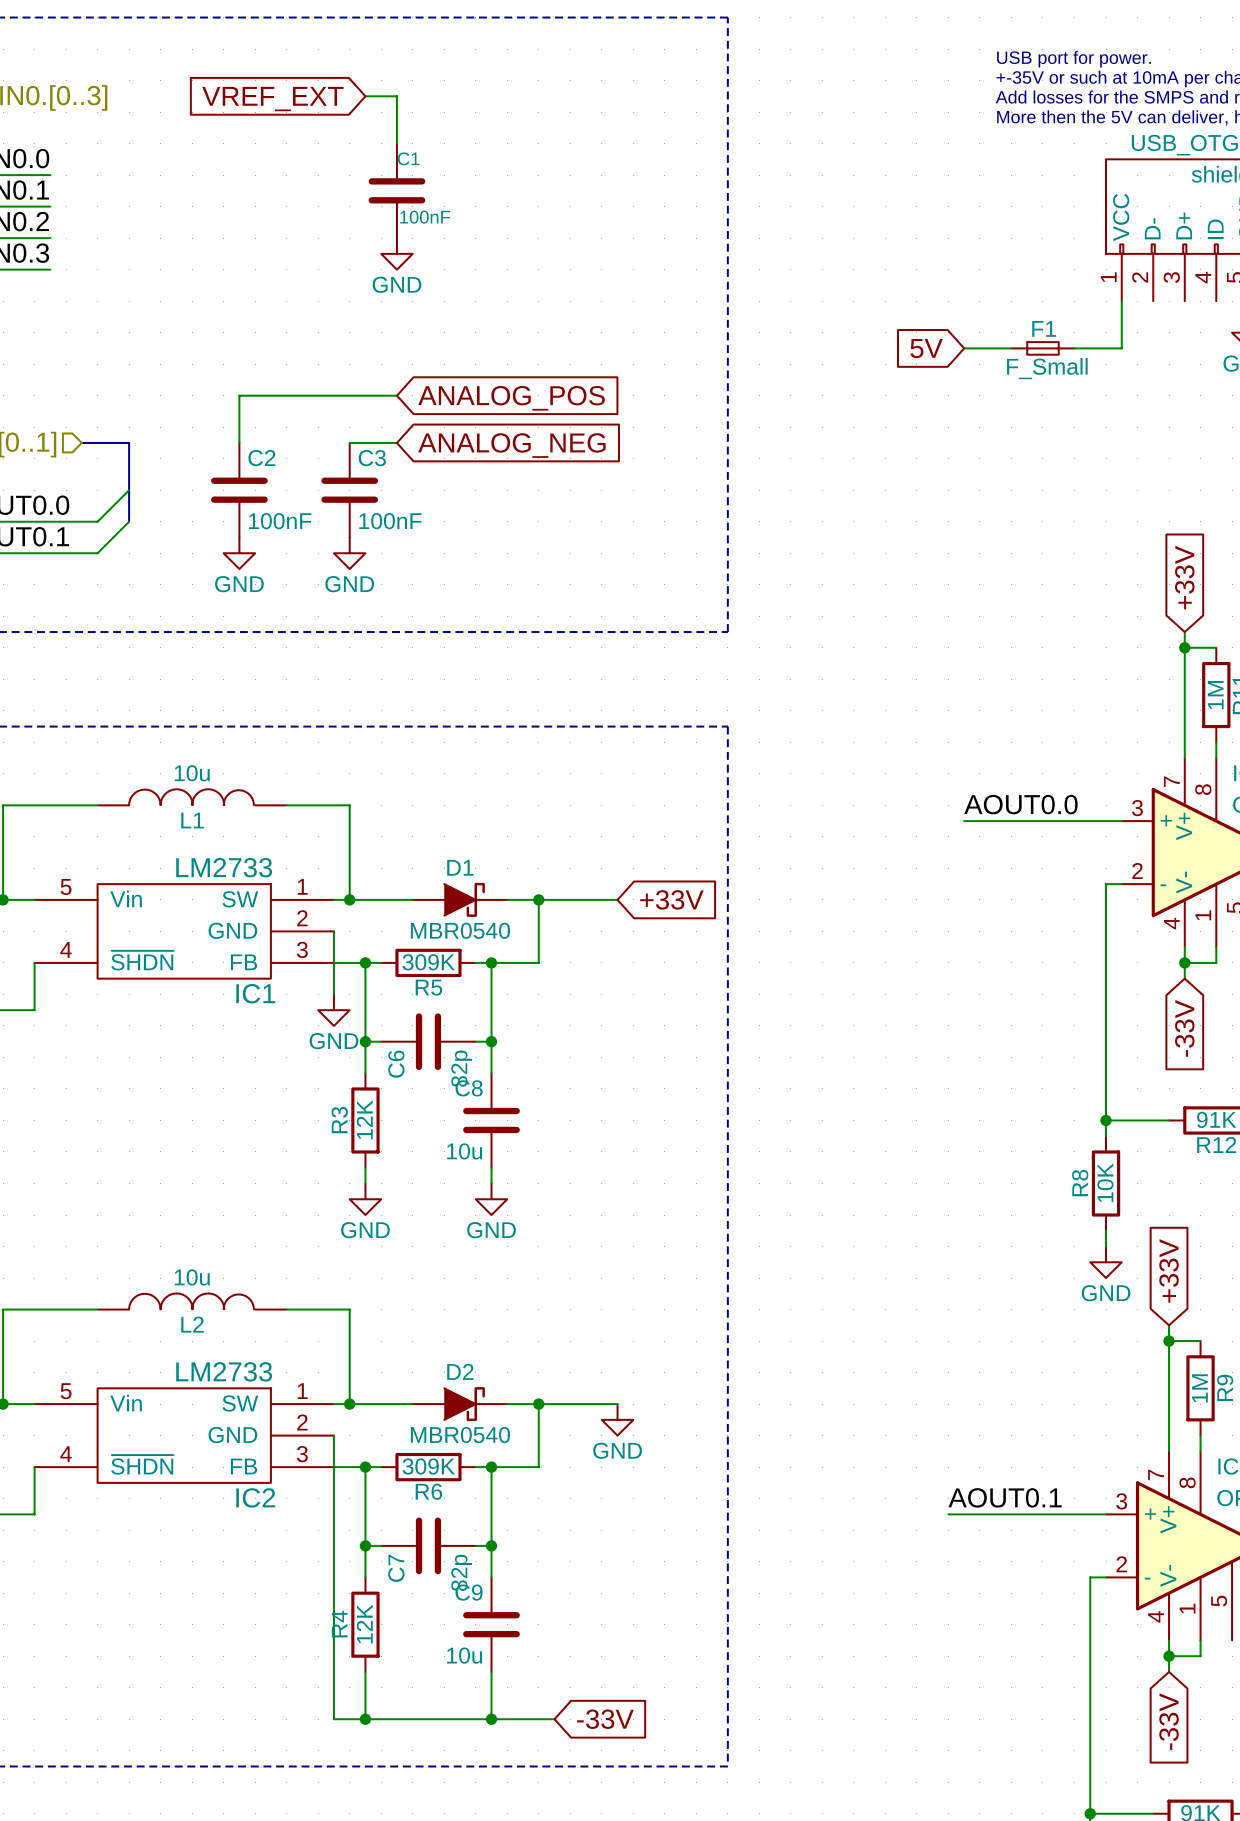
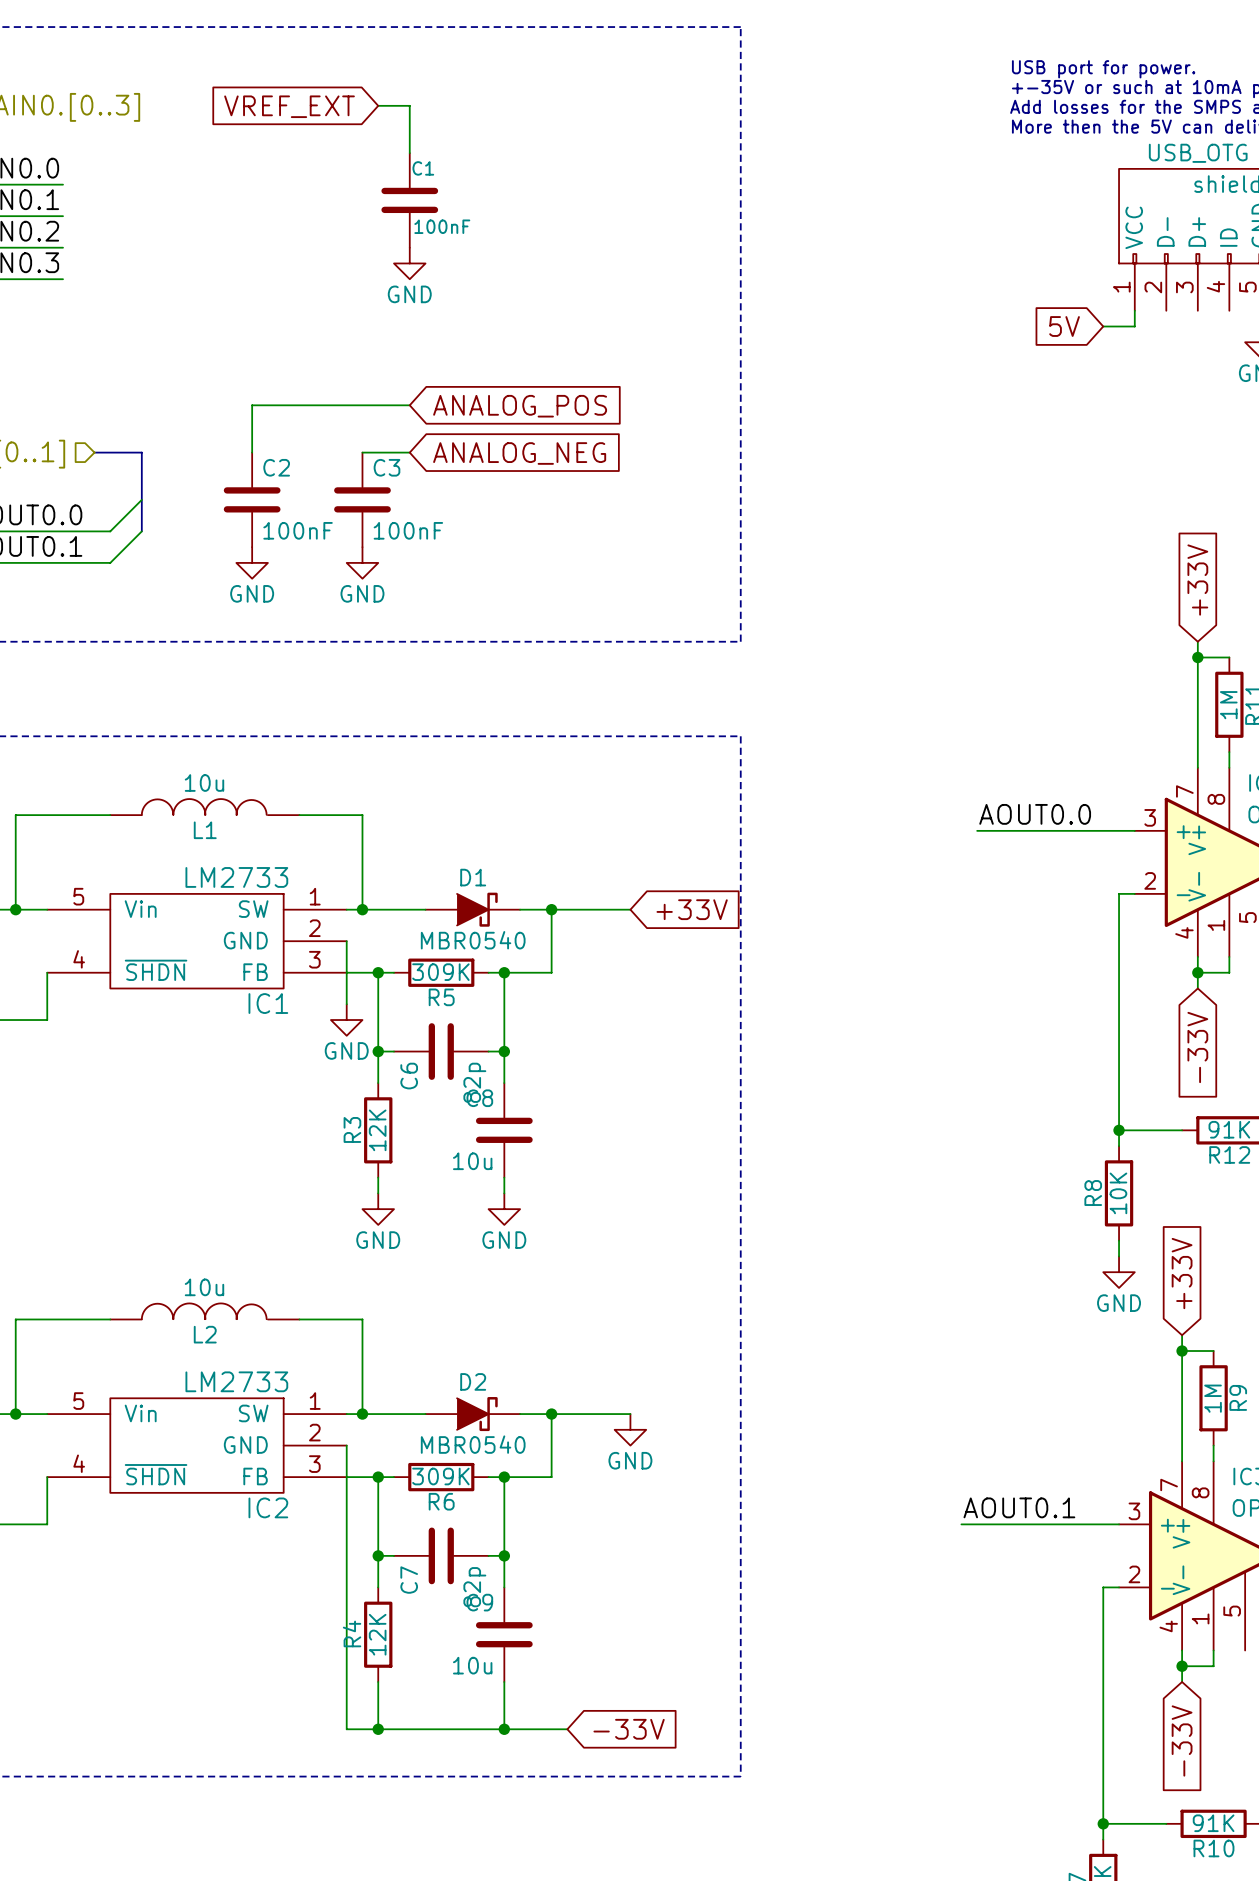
wire: (1121, 316) (1121, 348) (1074, 348) -> (1134, 326) (1103, 326)
global label position: 5V (926, 348) -> 5V (1064, 326)
wire: (964, 348) (1011, 348) -> none
F1: F_Small (1042, 348) -> none

